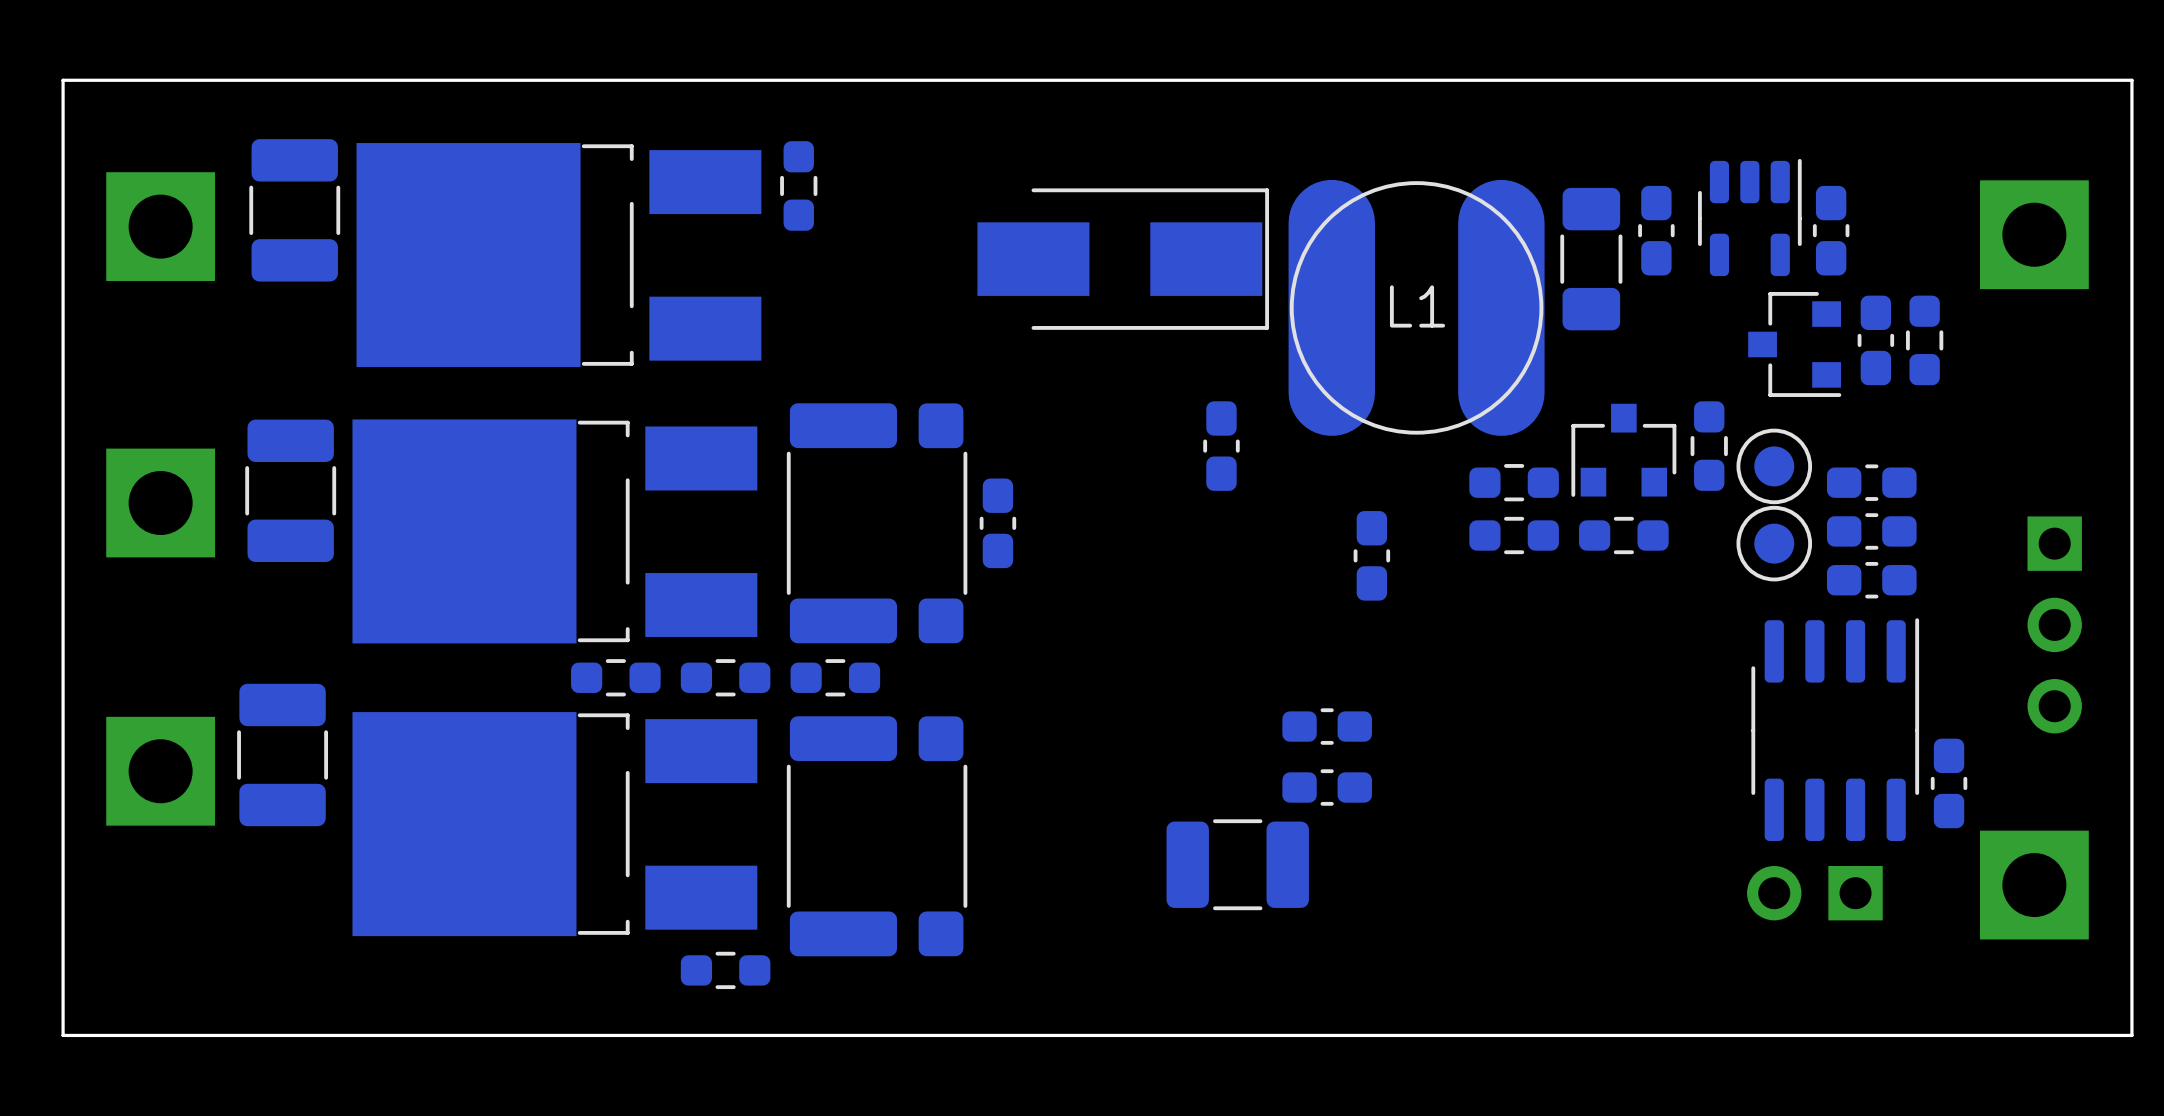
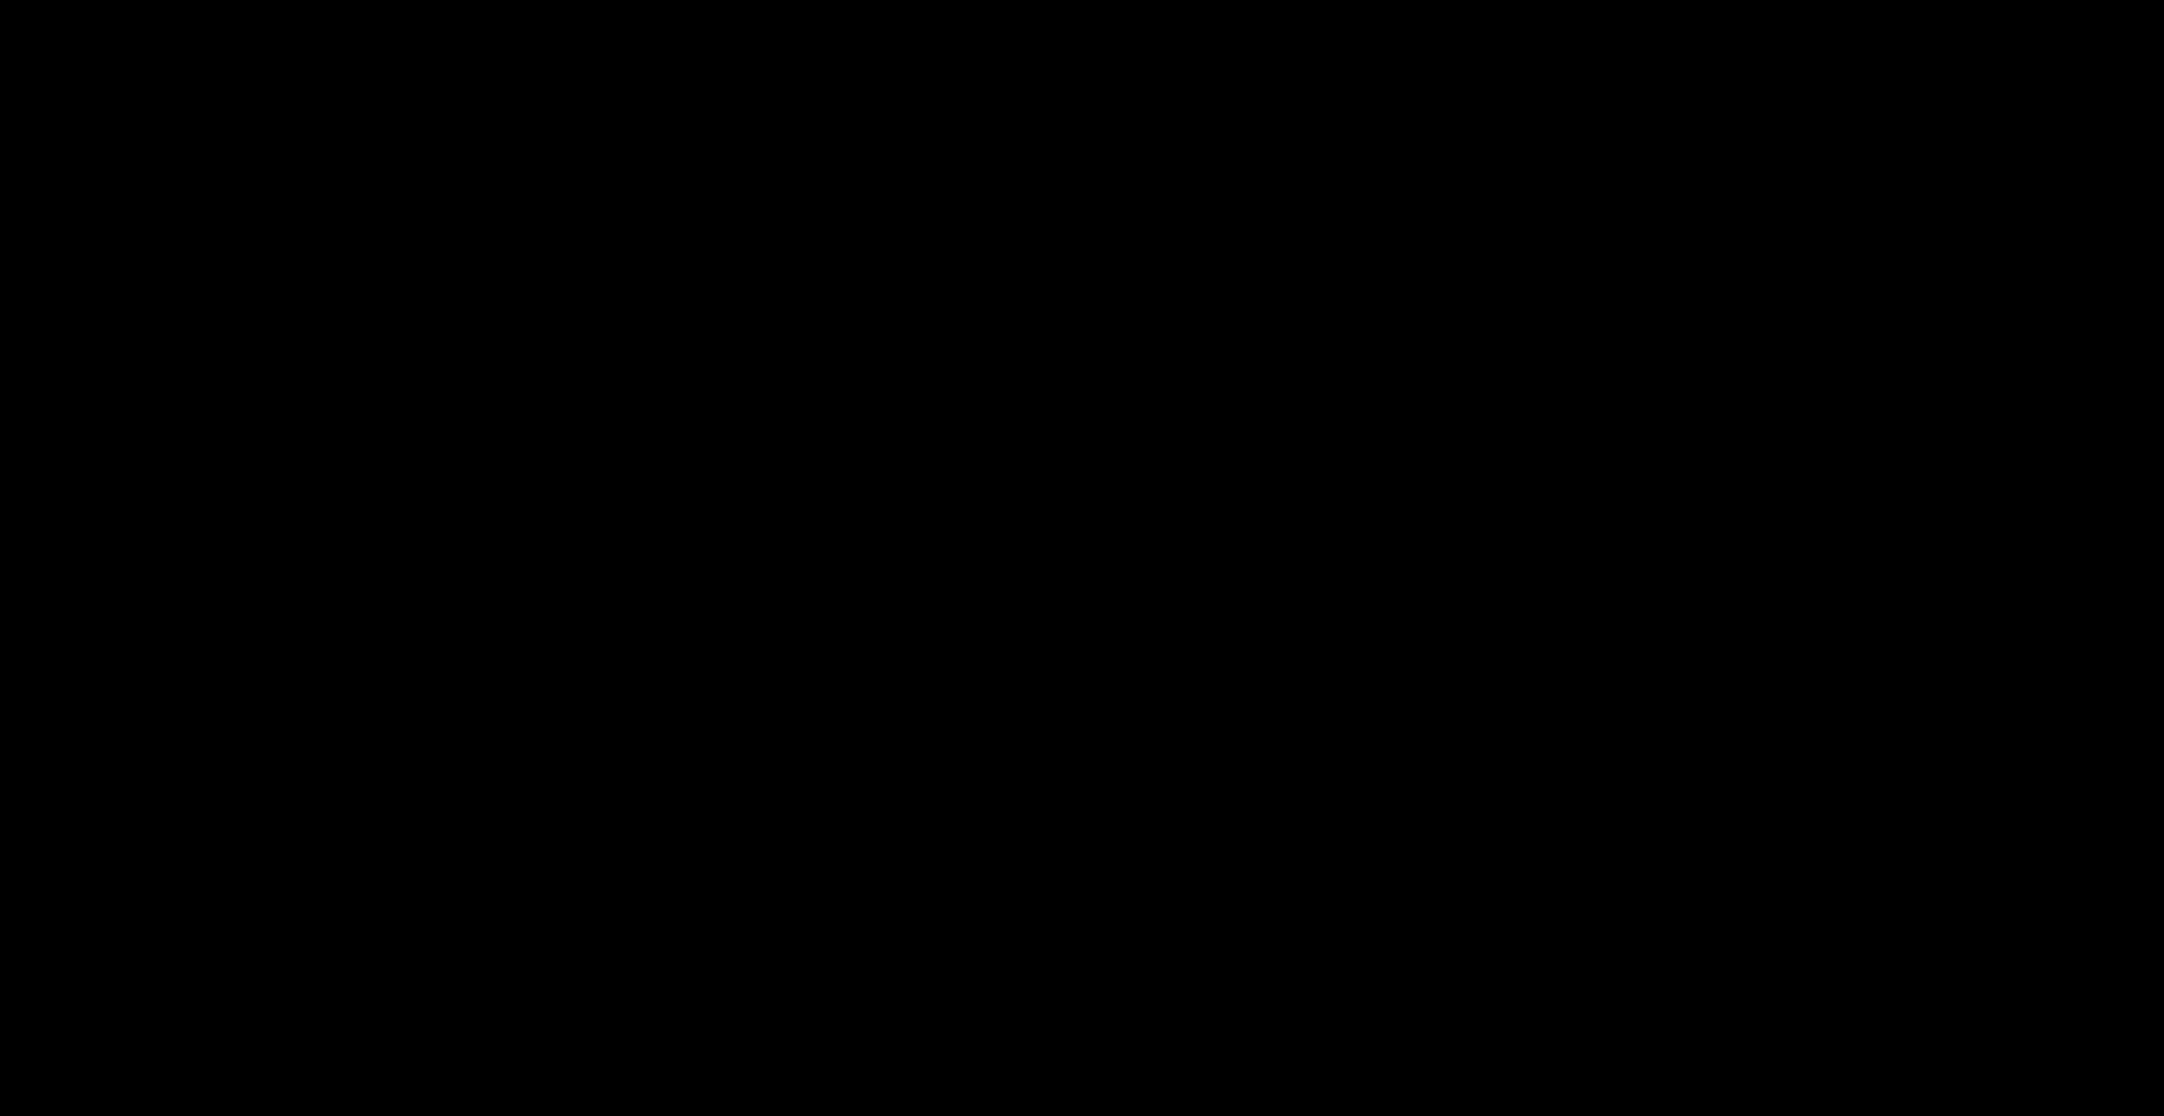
board edge: (2131, 80) (2131, 1035) (63, 1035) (63, 80) (2131, 80) -> none
part: (798, 185) -> none
part: (294, 210) -> none
part: (1749, 217) -> none
part: (160, 226) -> none
part: (1656, 230) -> none
part: (1831, 230) -> none
part: (2034, 234) -> none
part: (558, 255) -> none
part: (1123, 259) -> none
part: (1591, 259) -> none
L1: (1416, 307) -> none
part: (1875, 340) -> none
part: (1924, 340) -> none
part: (1794, 344) -> none
part: (1221, 446) -> none
part: (1709, 446) -> none
part: (1623, 450) -> none
part: (1774, 466) -> none
part: (1514, 482) -> none
part: (1871, 482) -> none
part: (290, 490) -> none
part: (160, 502) -> none
part: (877, 523) -> none
part: (997, 523) -> none
part: (554, 531) -> none
part: (1871, 531) -> none
part: (1514, 535) -> none
part: (1623, 535) -> none
part: (1774, 543) -> none
part: (1371, 555) -> none
part: (1871, 580) -> none
part: (2054, 624) -> none
part: (615, 677) -> none
part: (725, 677) -> none
part: (835, 677) -> none
part: (1327, 726) -> none
part: (1835, 729) -> none
part: (282, 754) -> none
part: (160, 771) -> none
part: (1949, 783) -> none
part: (1327, 787) -> none
part: (554, 824) -> none
part: (877, 836) -> none
part: (1237, 864) -> none
part: (2034, 885) -> none
part: (1814, 893) -> none
part: (725, 970) -> none

